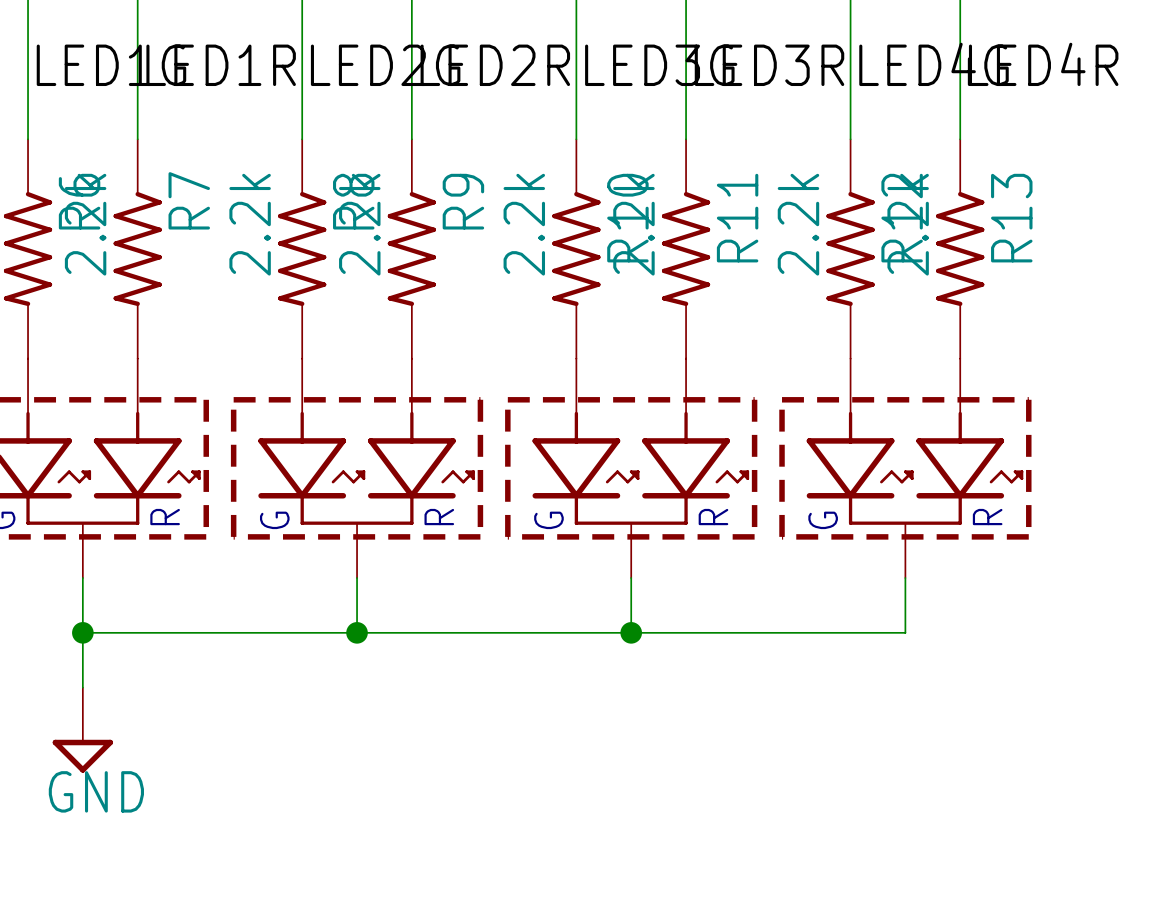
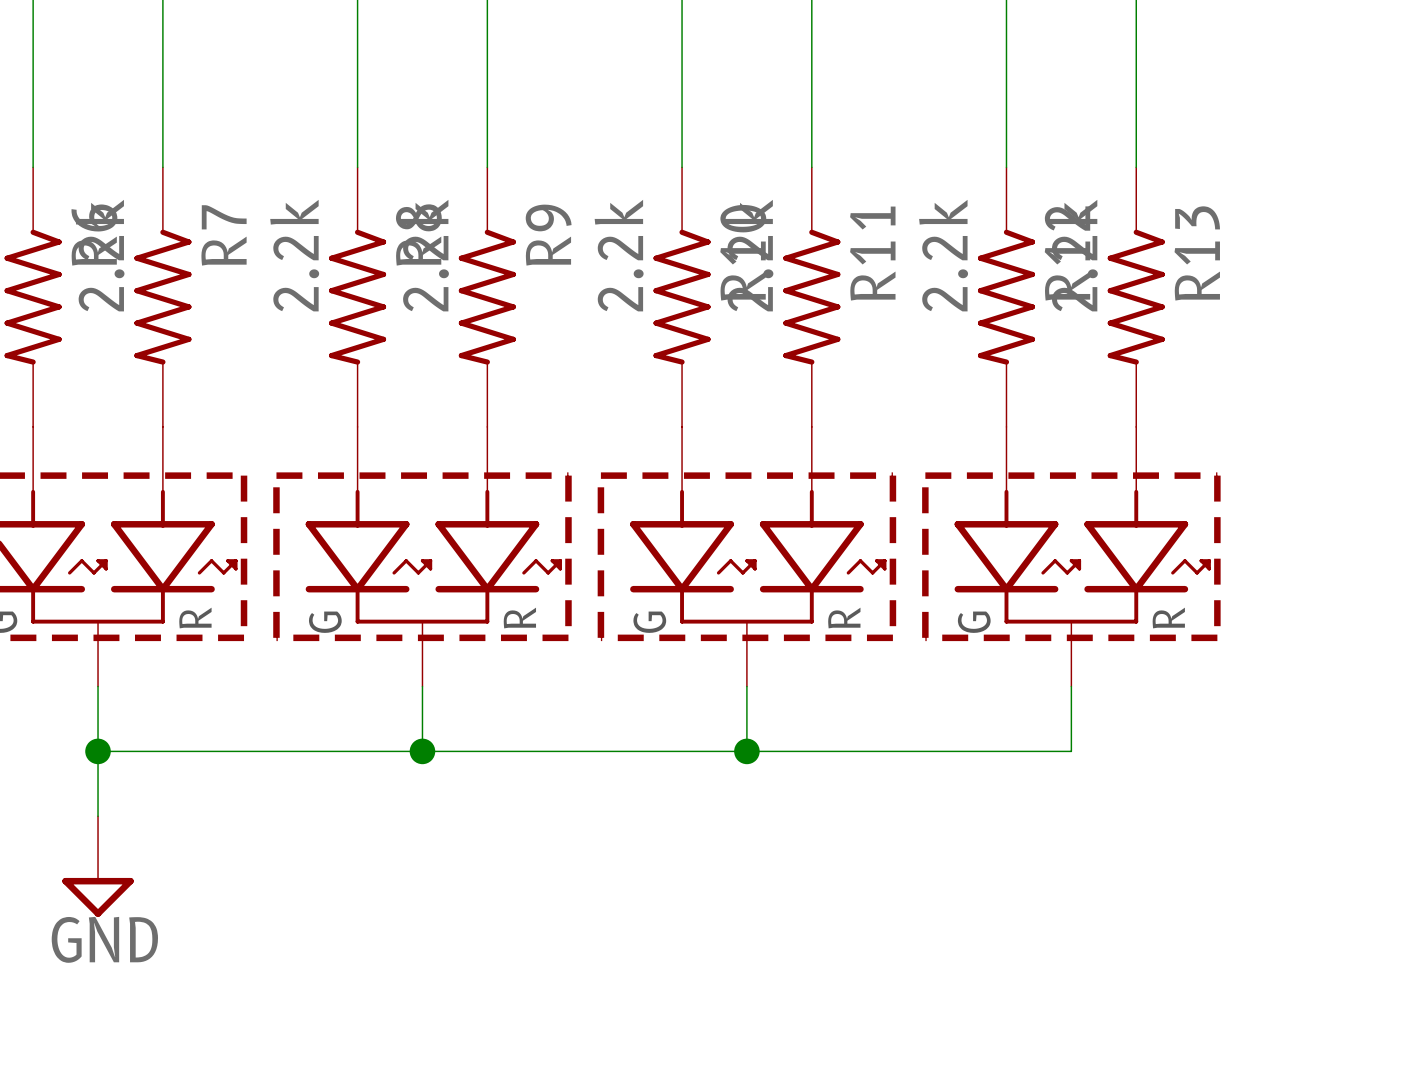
label: LED4G (934, 64) -> none
label: LED4R (1043, 64) -> none
label: LED1G (111, 65) -> none
label: LED1R (221, 65) -> none
label: LED2G (385, 65) -> none
label: LED2R (495, 65) -> none
label: LED3G (659, 65) -> none
label: LED3R (769, 65) -> none

